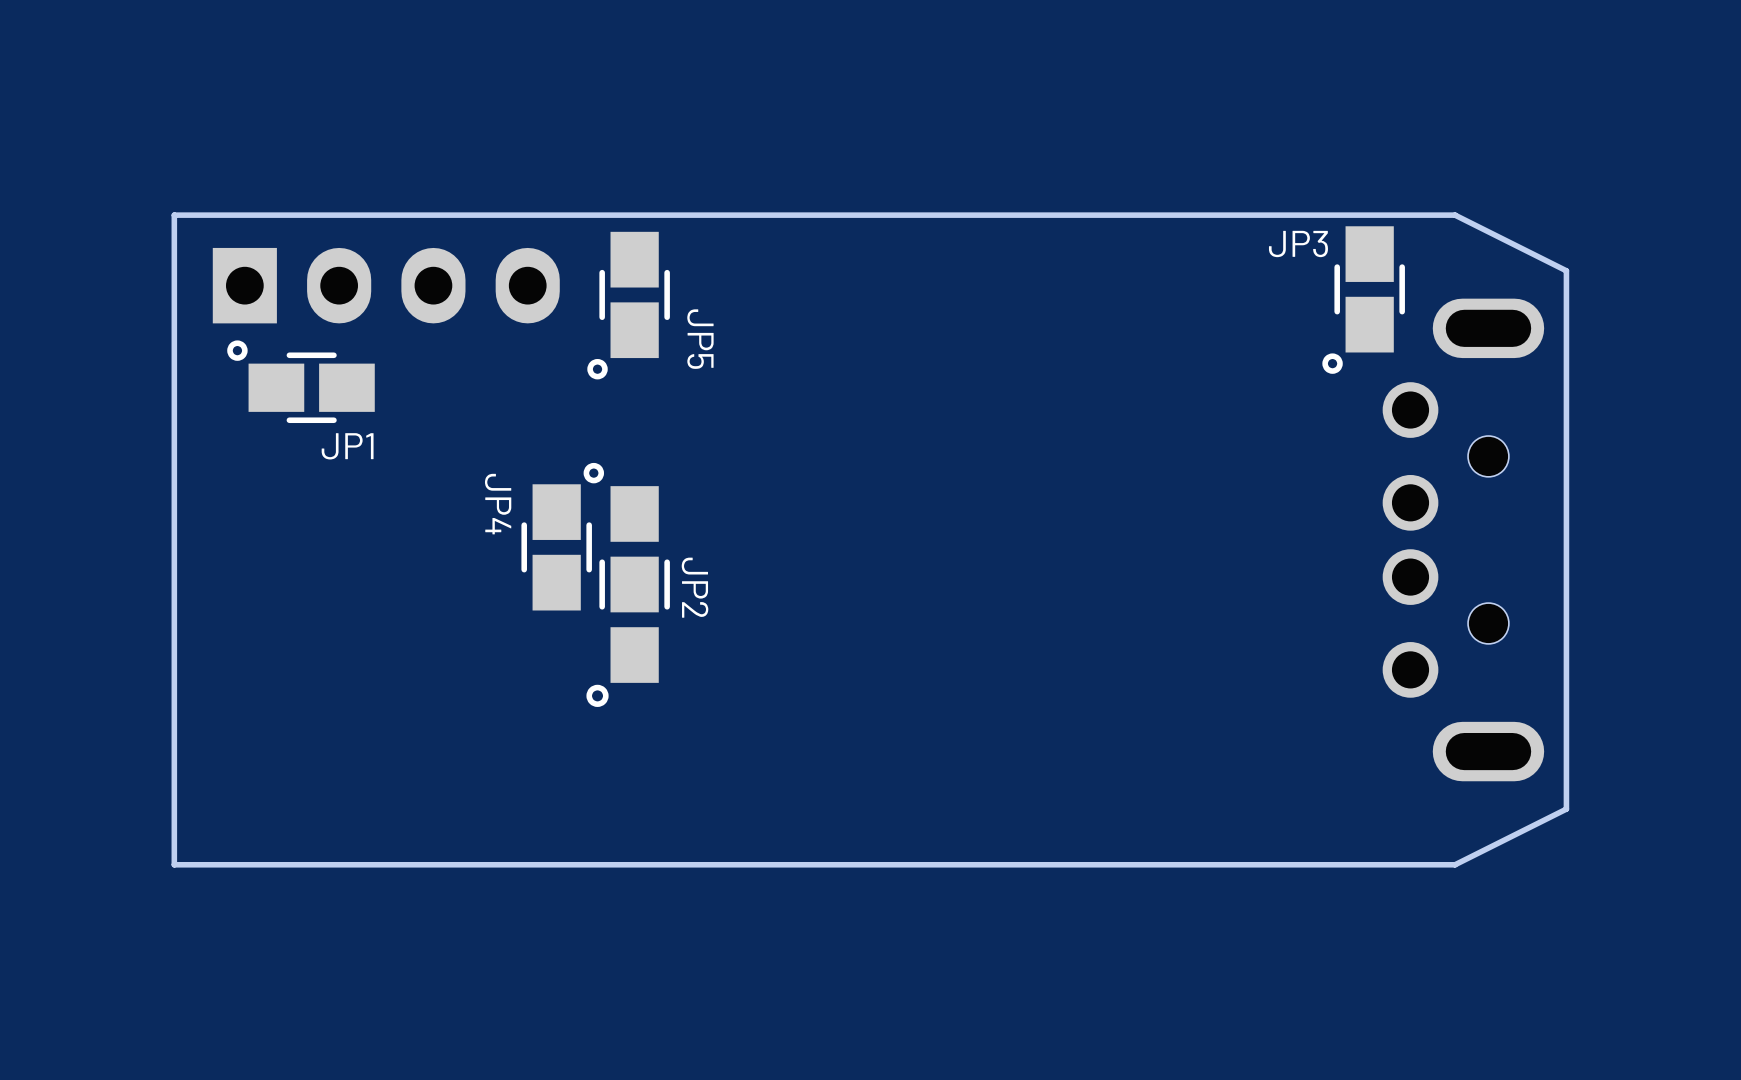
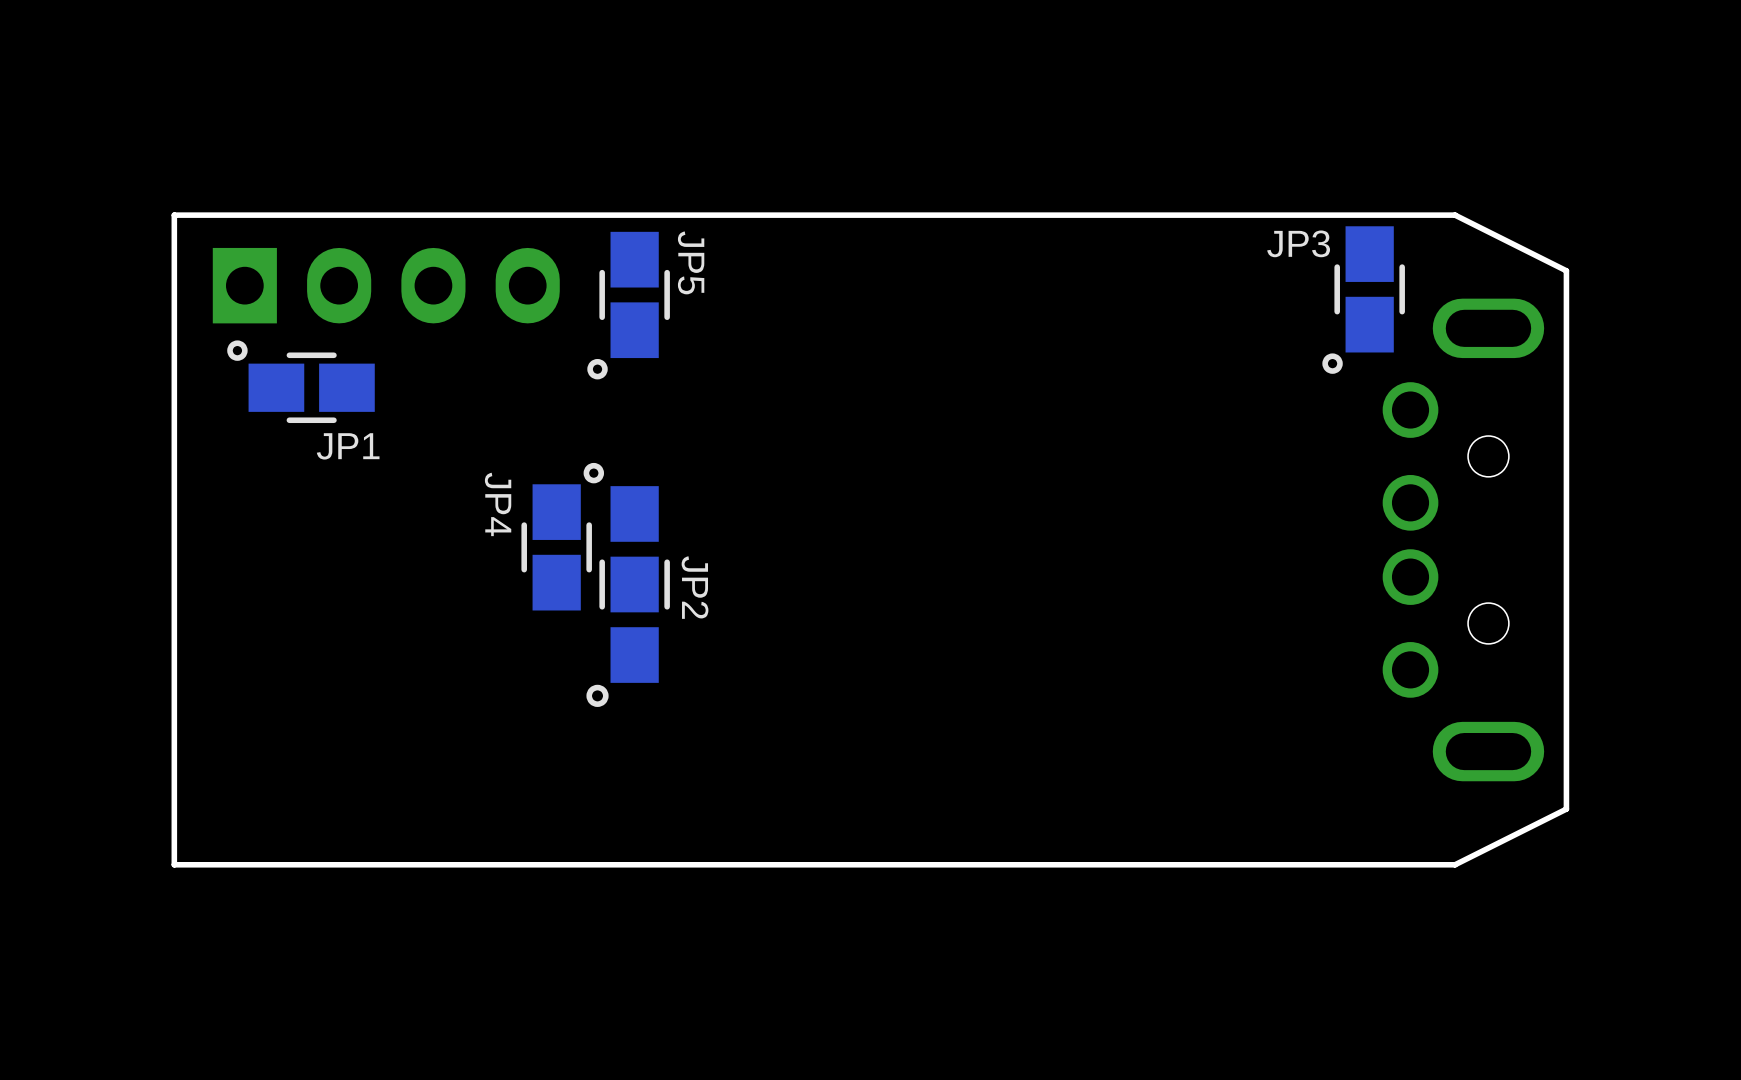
JP5 name position: JP5 (700, 339) -> JP5 (691, 262)

